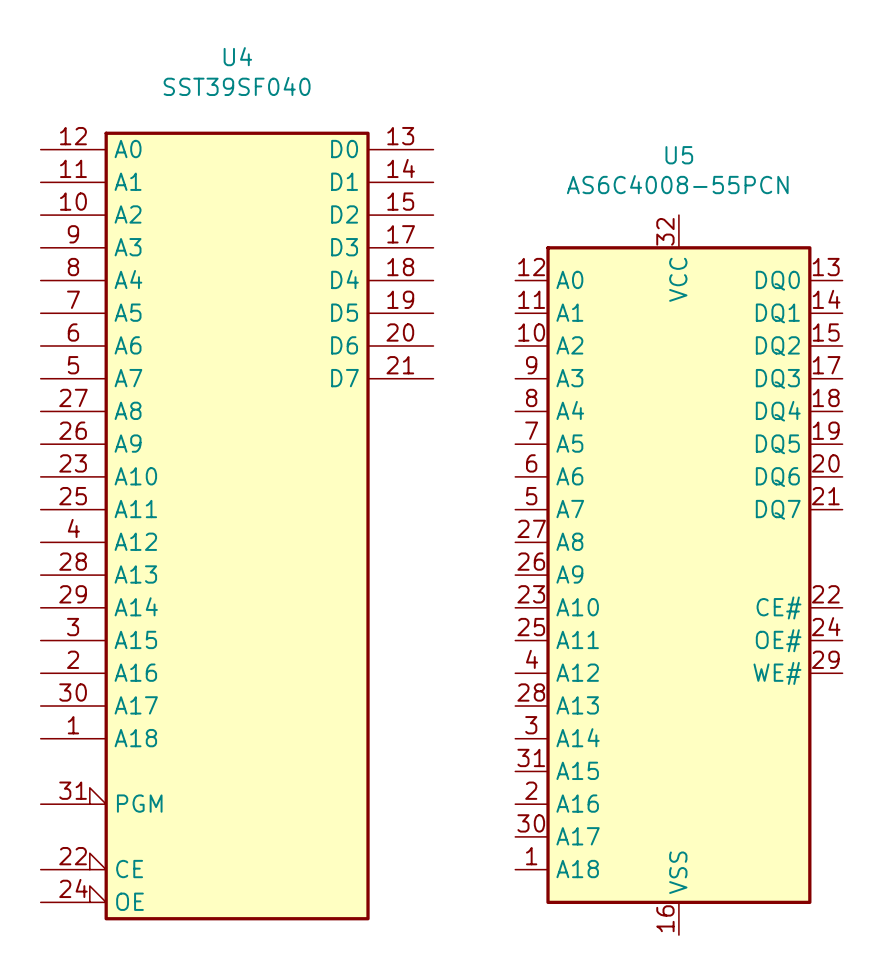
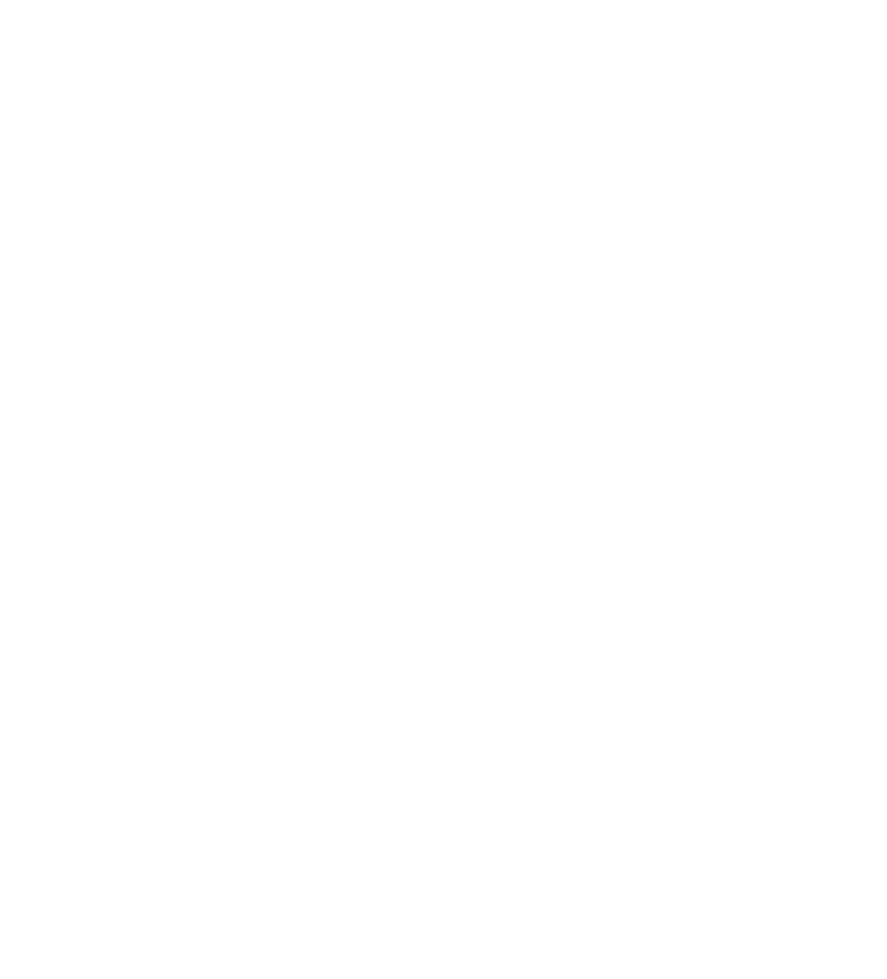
U4: SST39SF040 (237, 526) -> none
U5: AS6C4008-55PCN (678, 575) -> none

